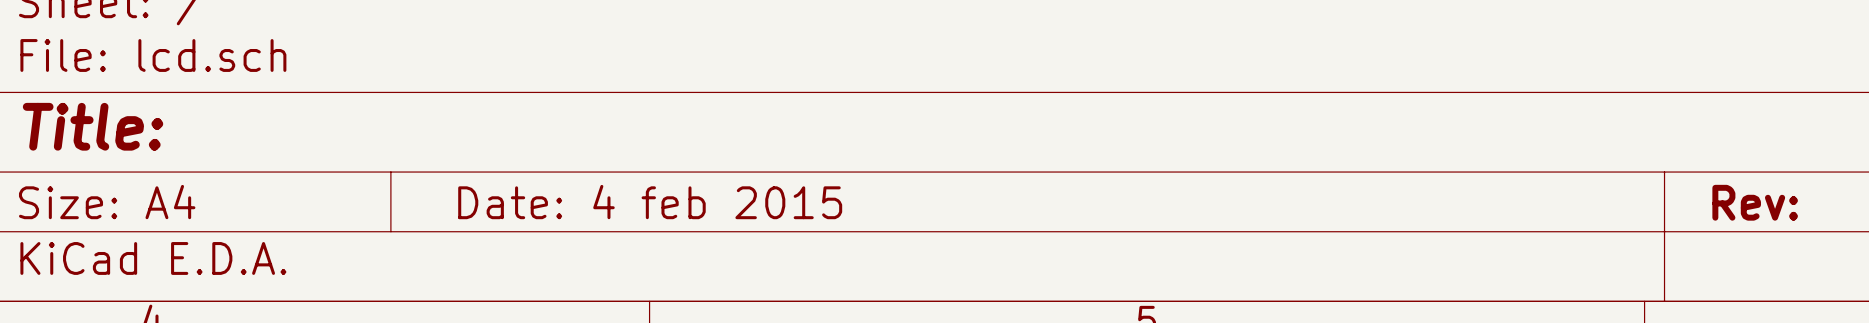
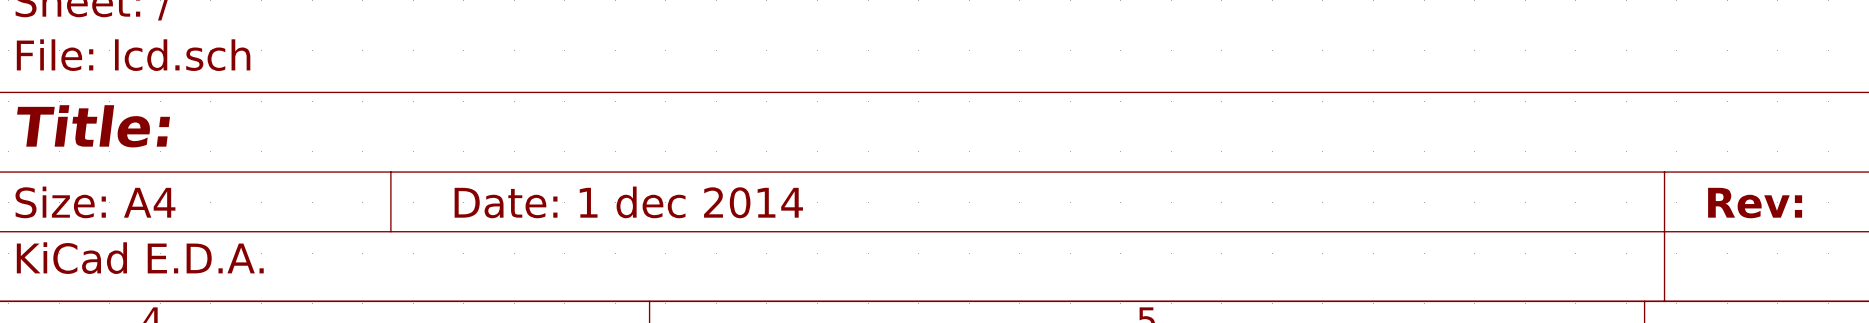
title block: Date: 4 feb 2015 (650, 202) -> Date: 1 dec 2014 (628, 202)

